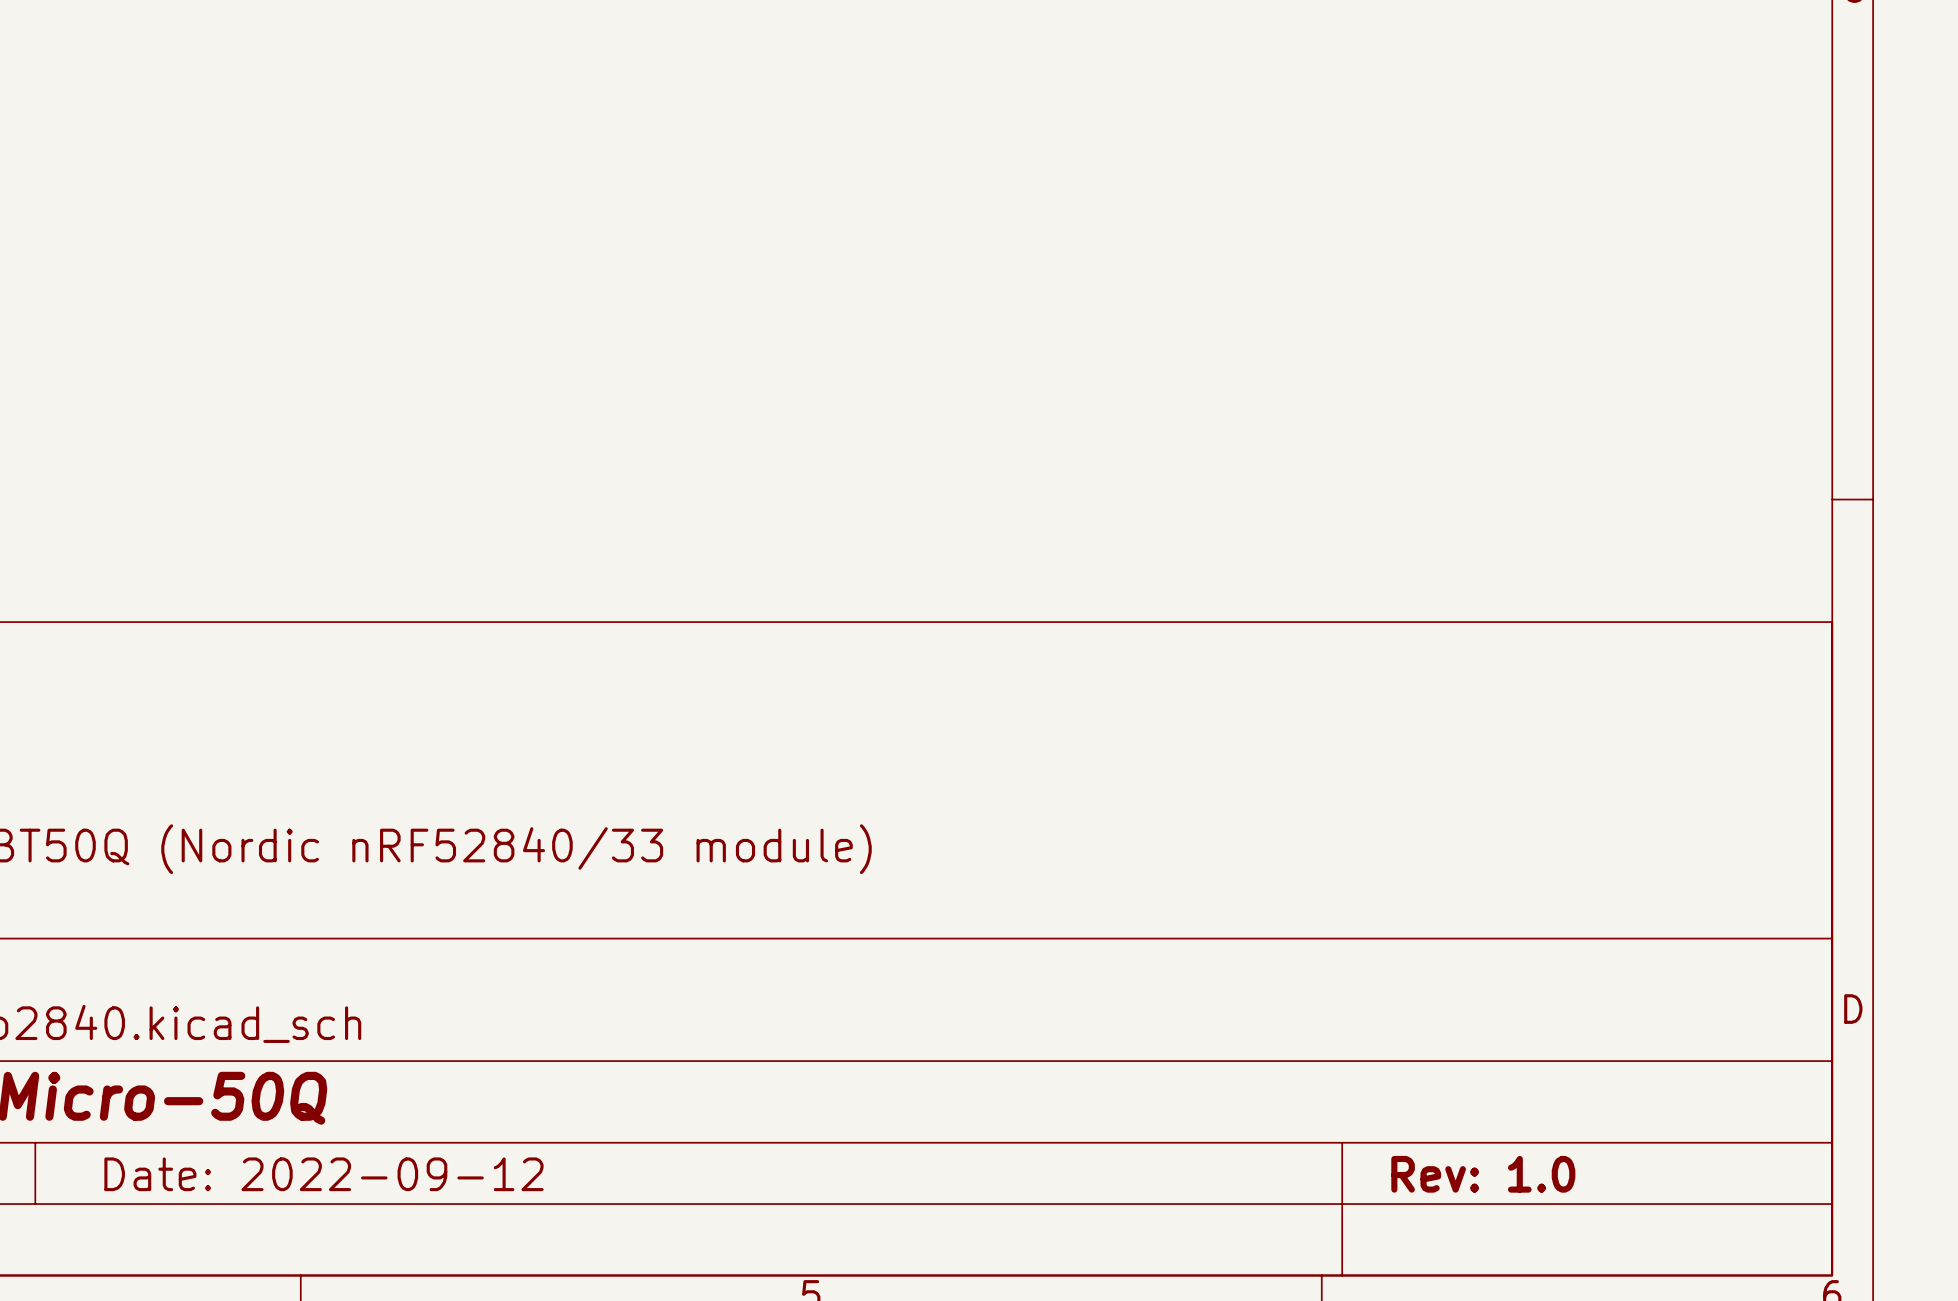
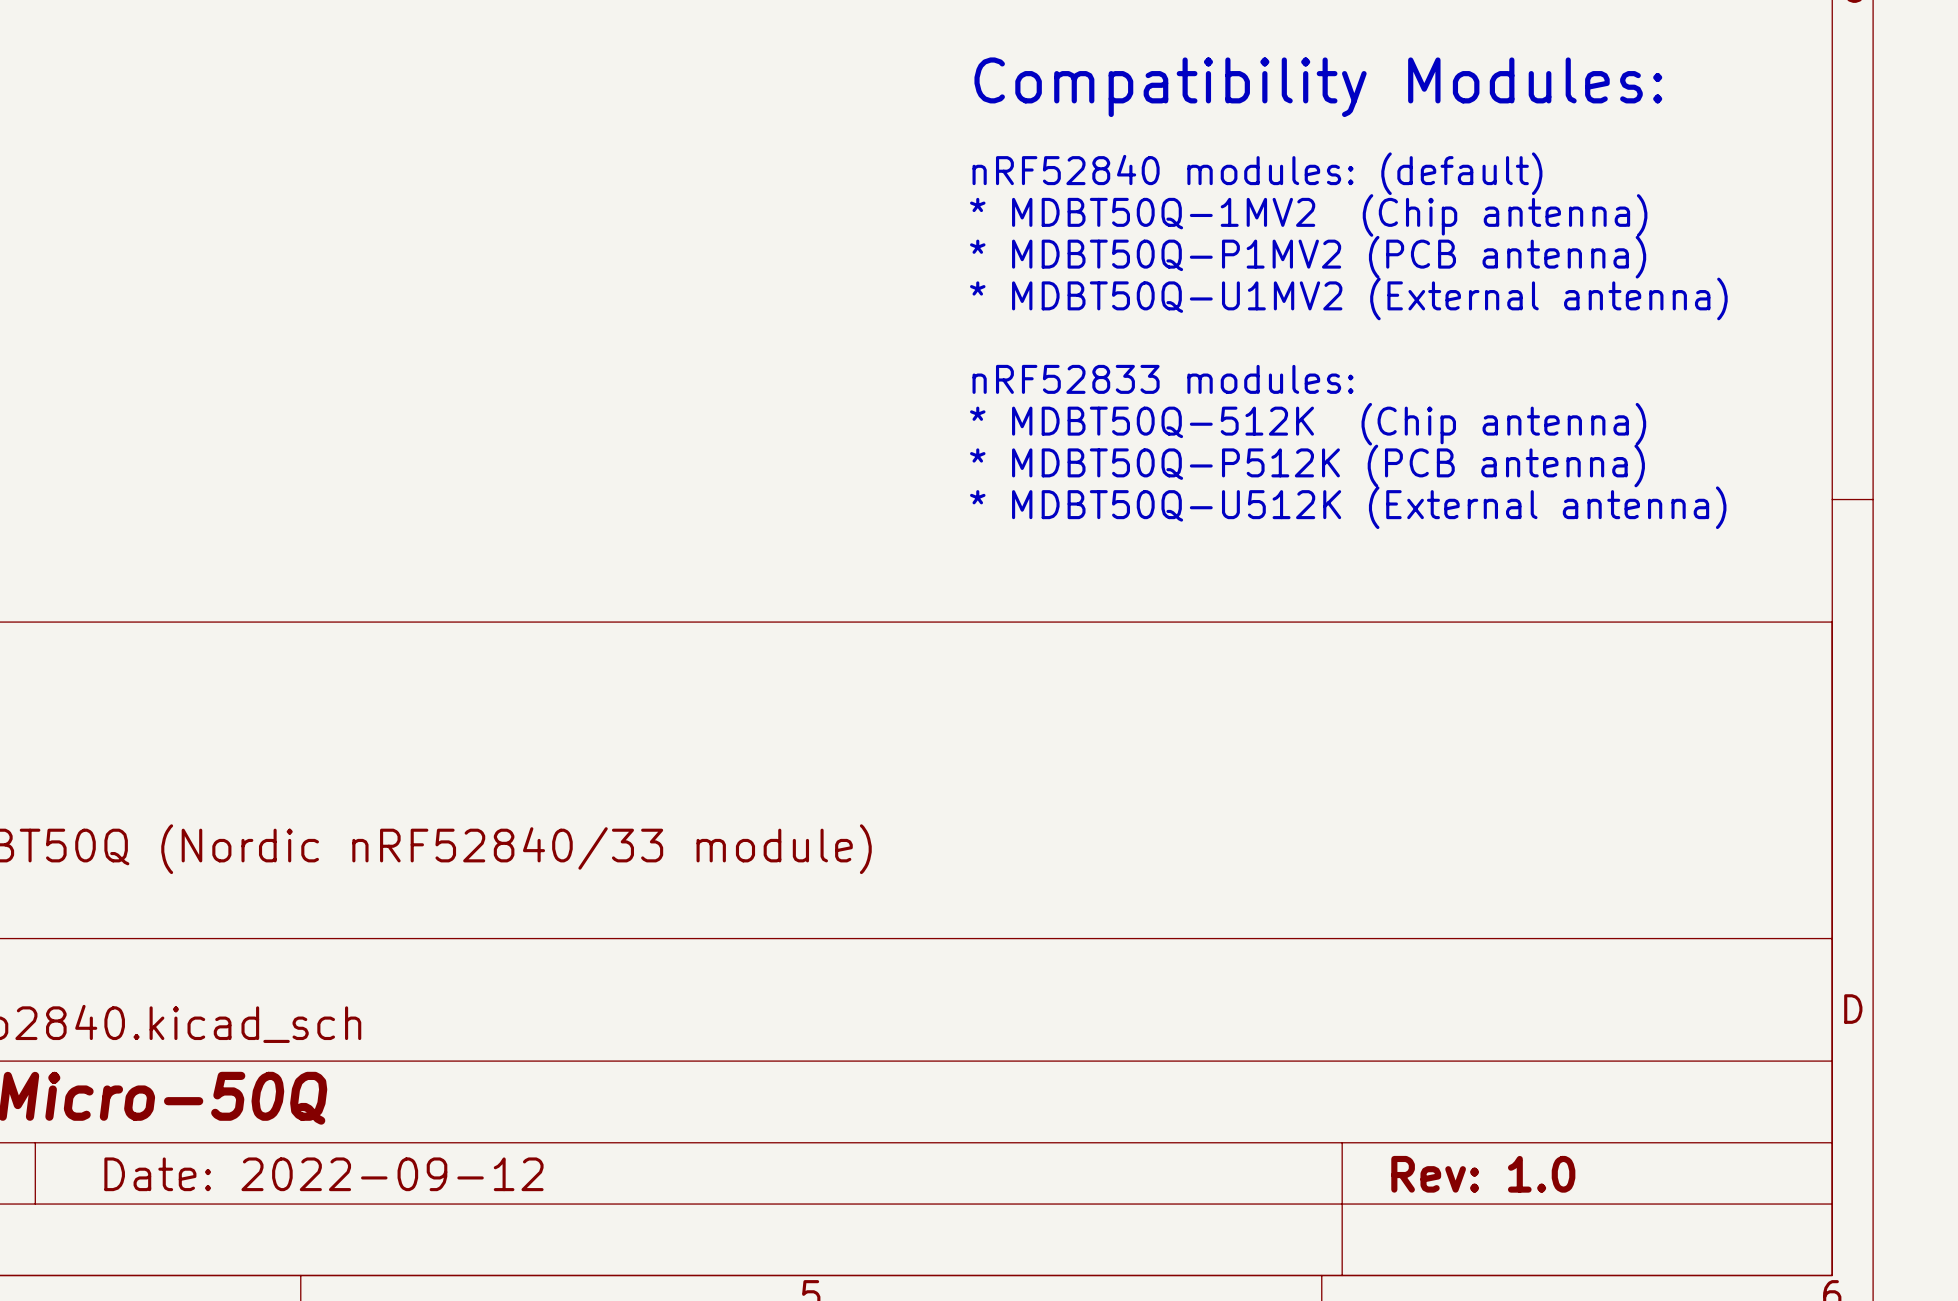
text: none -> Compatibility Modules: (1318, 87)
text: none -> nRF52840 modules: (default) (1257, 173)
text: none -> * MDBT50Q-1MV2 (Chip antenna) (1308, 215)
text: none -> * MDBT50Q-P1MV2 (PCB antenna) (1308, 257)
text: none -> * MDBT50Q-U1MV2 (External antenna) (1348, 298)
text: none -> nRF52833 modules: (1163, 379)
text: none -> * MDBT50Q-512K (Chip antenna) (1308, 424)
text: none -> * MDBT50Q-P512K (PCB antenna) (1307, 465)
text: none -> * MDBT50Q-U512K (External antenna) (1348, 507)

